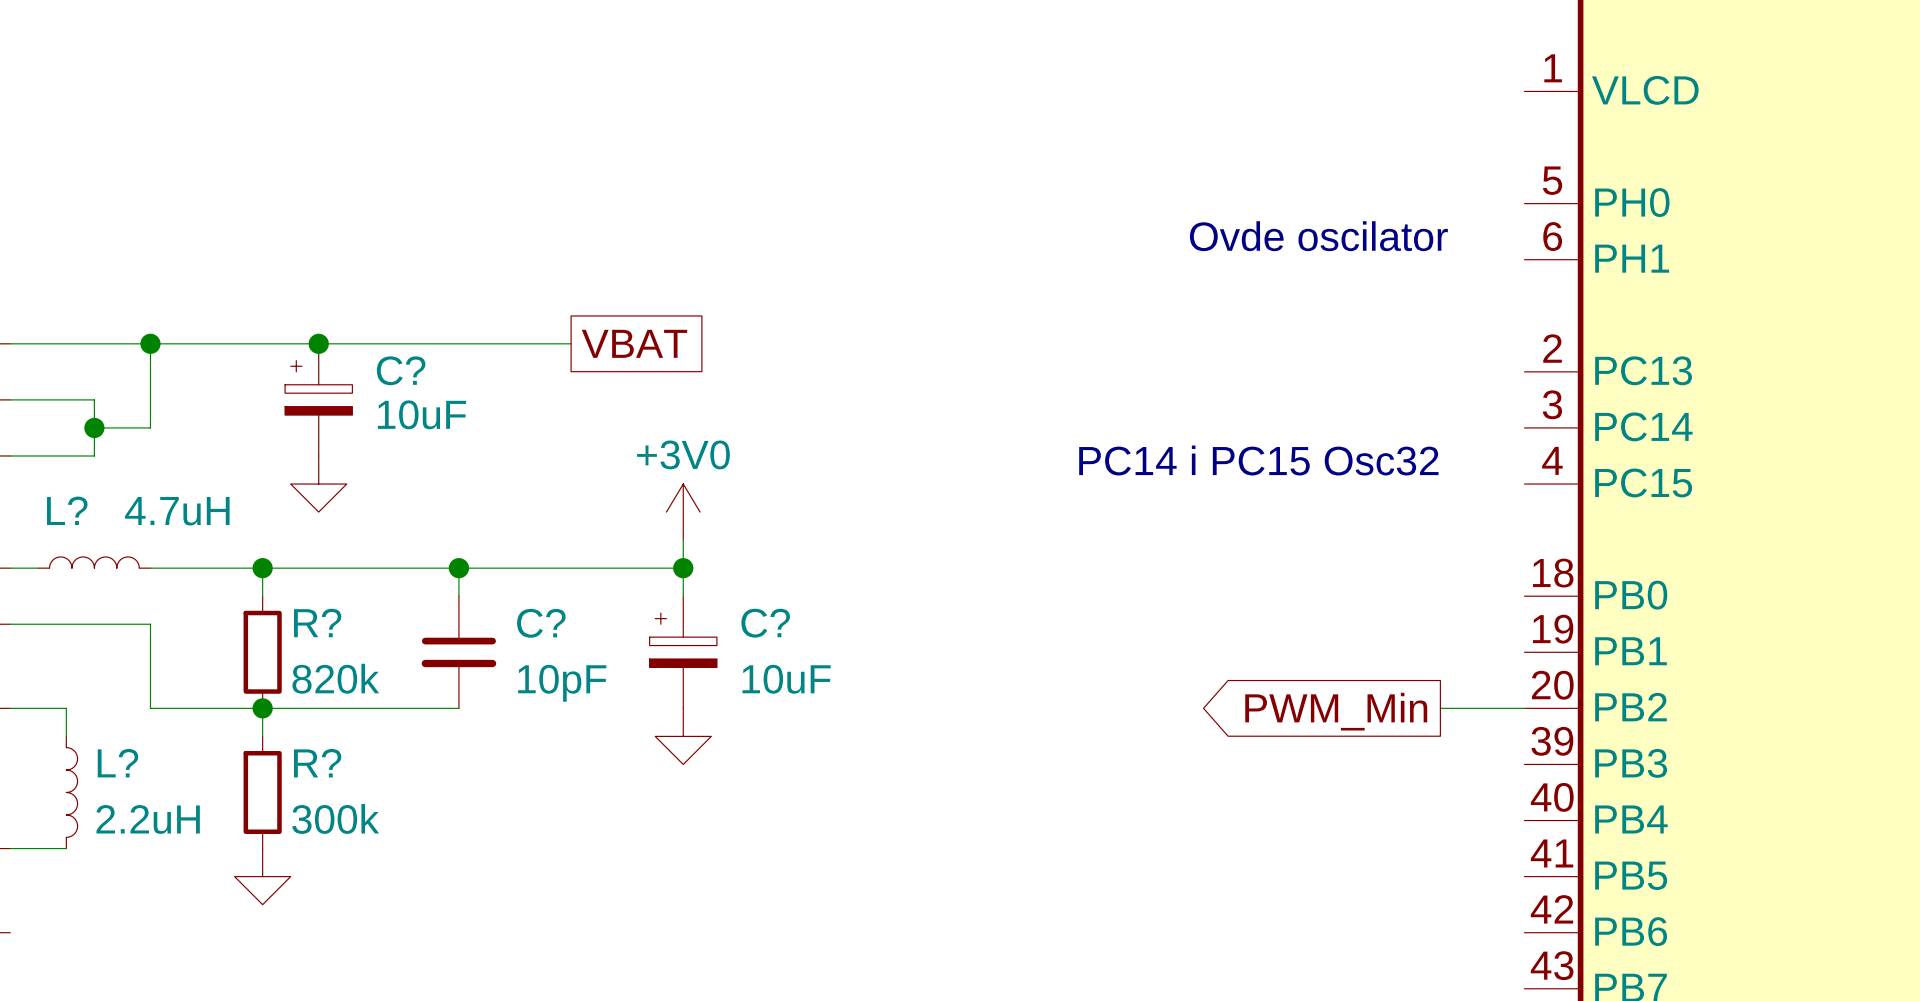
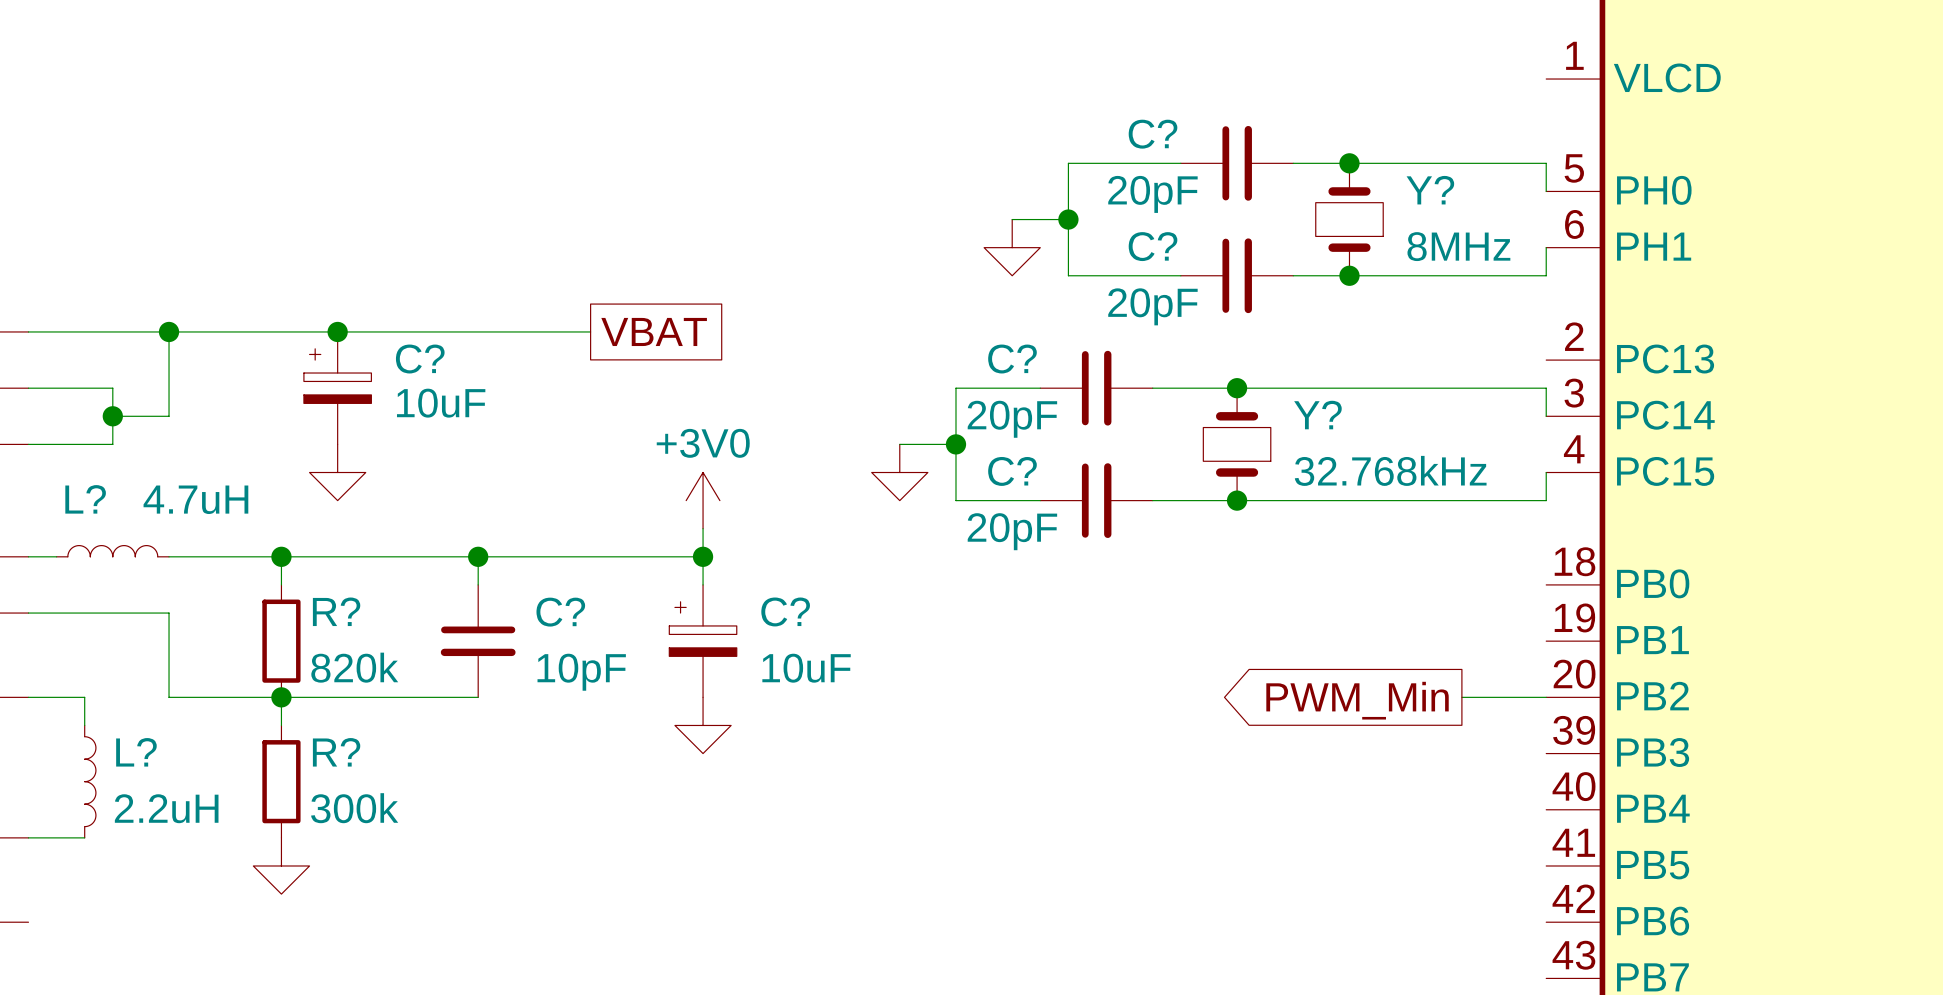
wire: none -> (1180, 163) (1068, 163) (1068, 275) (1180, 275)
C?: none -> 20pF (1237, 163)
wire: none -> (1293, 163) (1546, 163) (1546, 191)
junction: none -> (1349, 163)
wire: none -> (1012, 219) (1068, 219)
junction: none -> (1068, 219)
Y?: none -> 8MHz (1349, 219)
text: Ovde oscilator (1318, 236) -> none
power symbol: none -> (1012, 247)
wire: none -> (1546, 247) (1546, 275) (1293, 275)
C?: none -> 20pF (1237, 275)
junction: none -> (1349, 275)
wire: none -> (1040, 388) (955, 388) (955, 500) (1040, 500)
C?: none -> 20pF (1096, 388)
wire: none -> (1152, 388) (1546, 388) (1546, 416)
junction: none -> (1237, 388)
wire: none -> (899, 444) (955, 444)
junction: none -> (955, 444)
Y?: none -> 32.768kHz (1237, 444)
text: PC14 i PC15 Osc32 (1258, 460) -> none
power symbol: none -> (899, 472)
wire: none -> (1546, 472) (1546, 500) (1152, 500)
C?: none -> 20pF (1096, 500)
junction: none -> (1237, 500)

